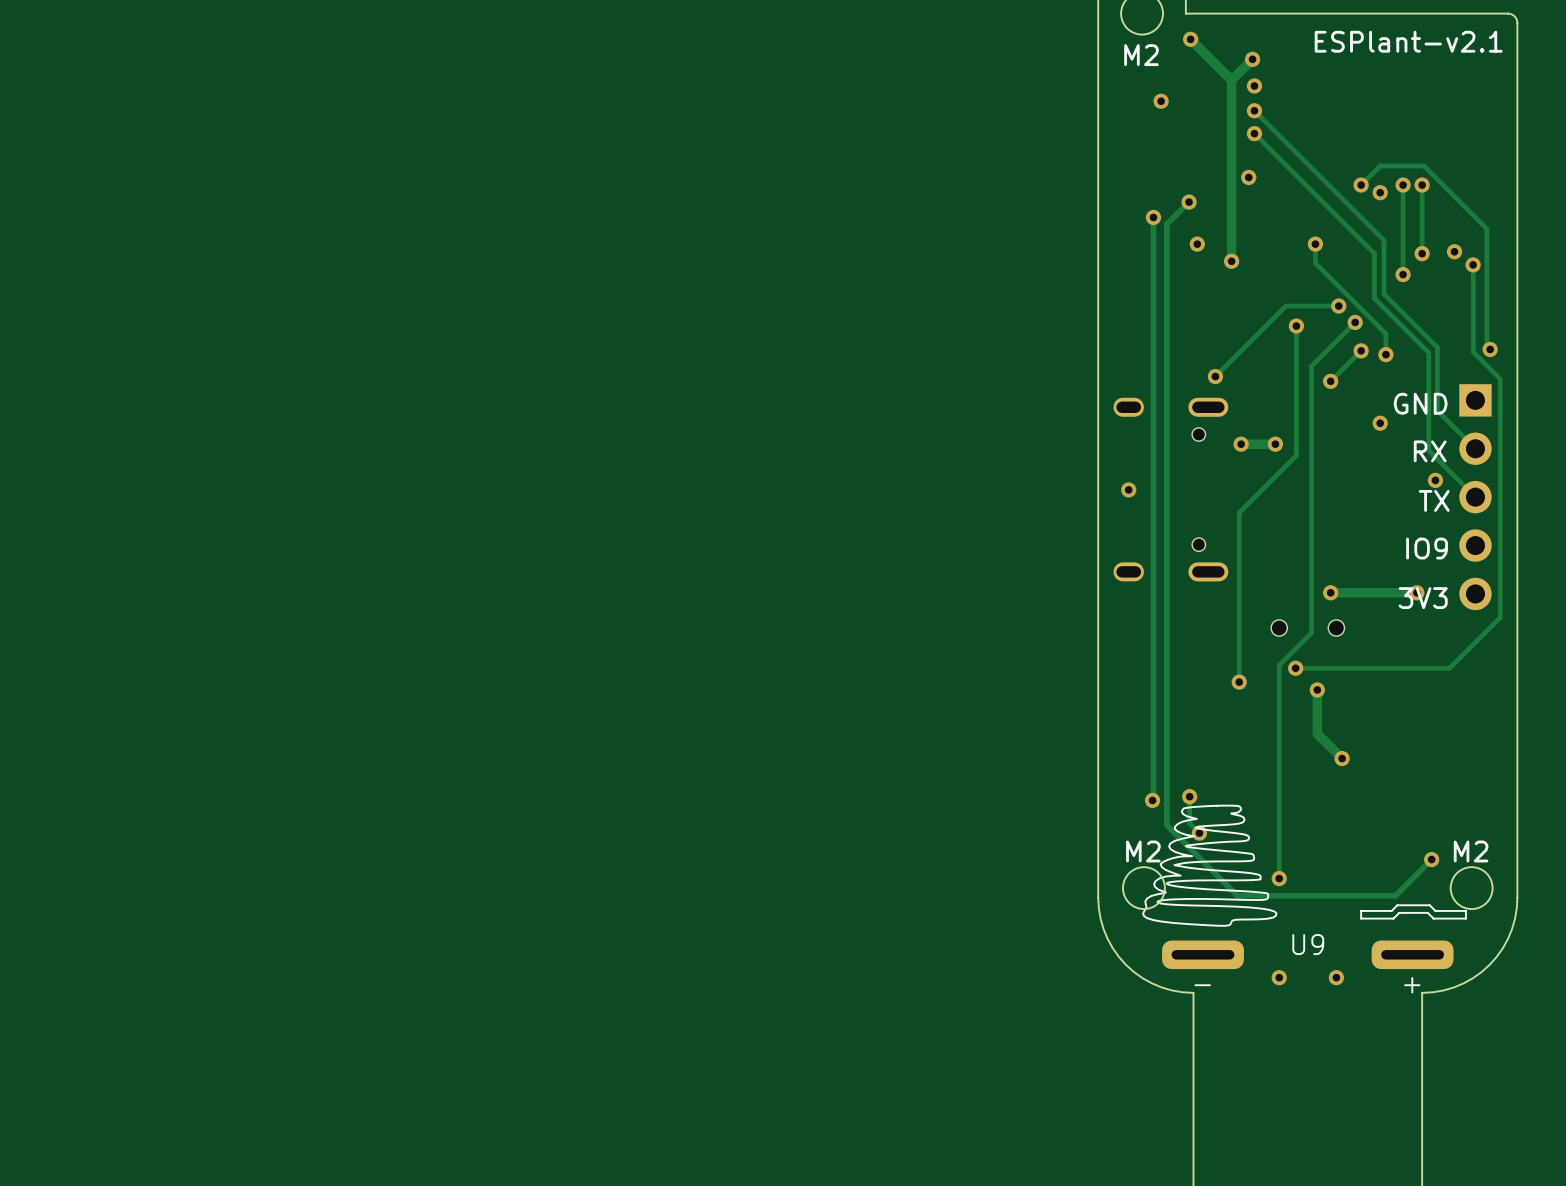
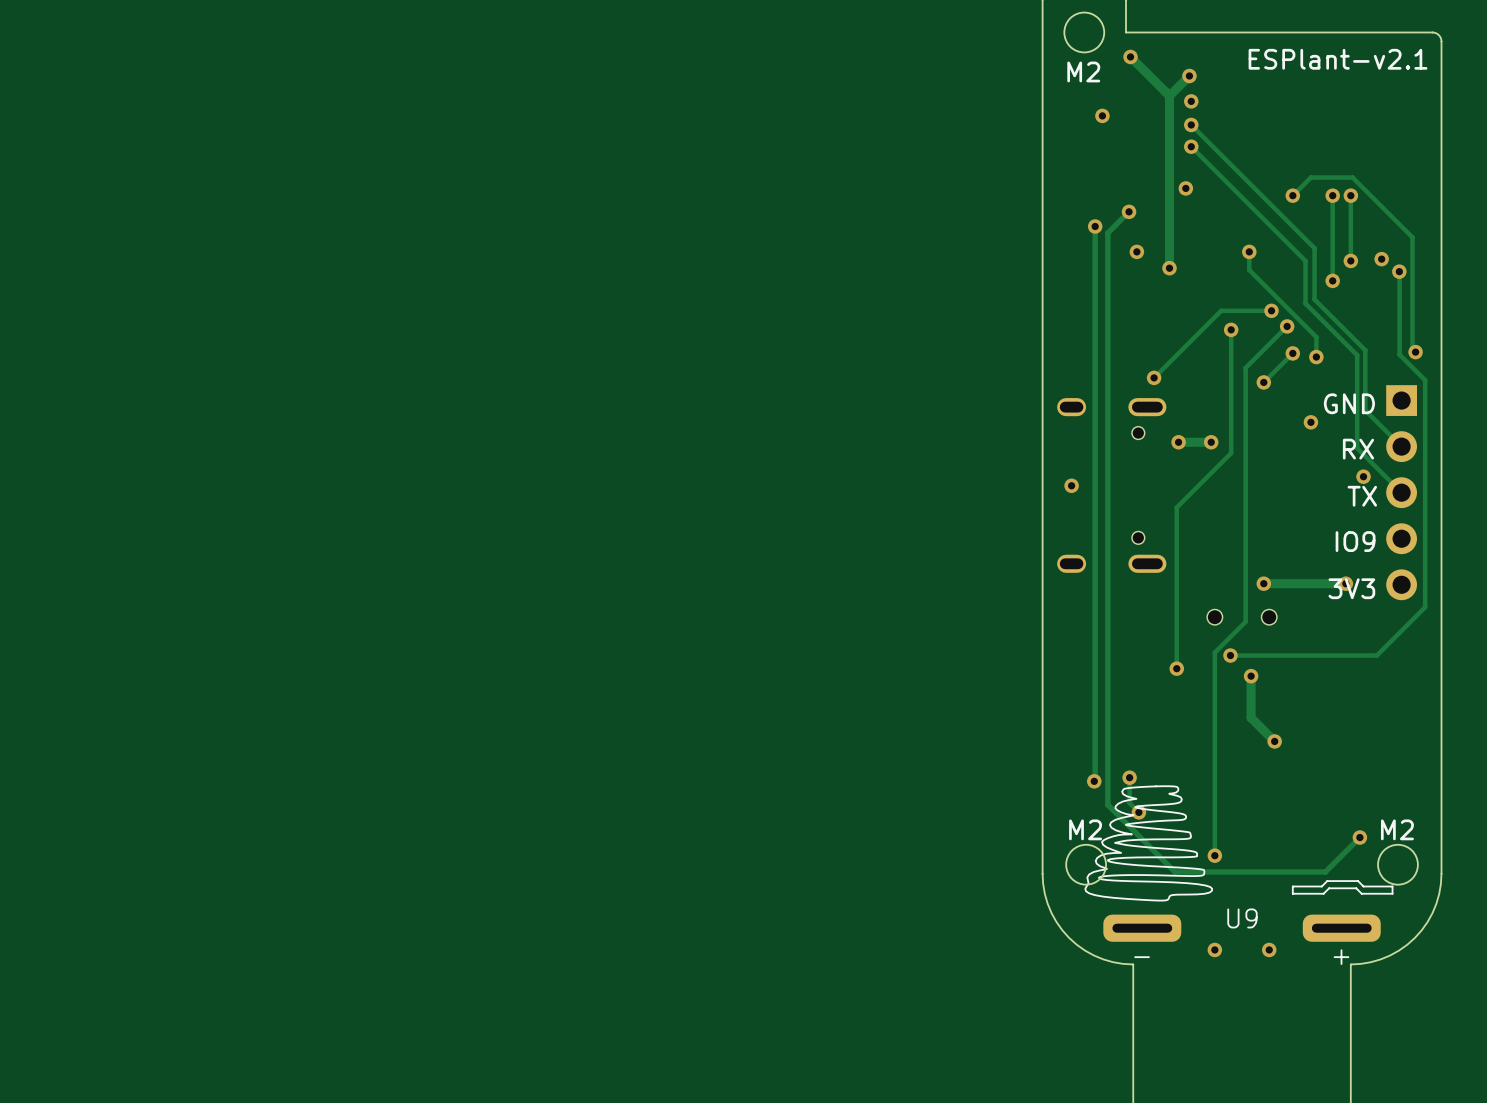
via: (1380, 192) -> none

